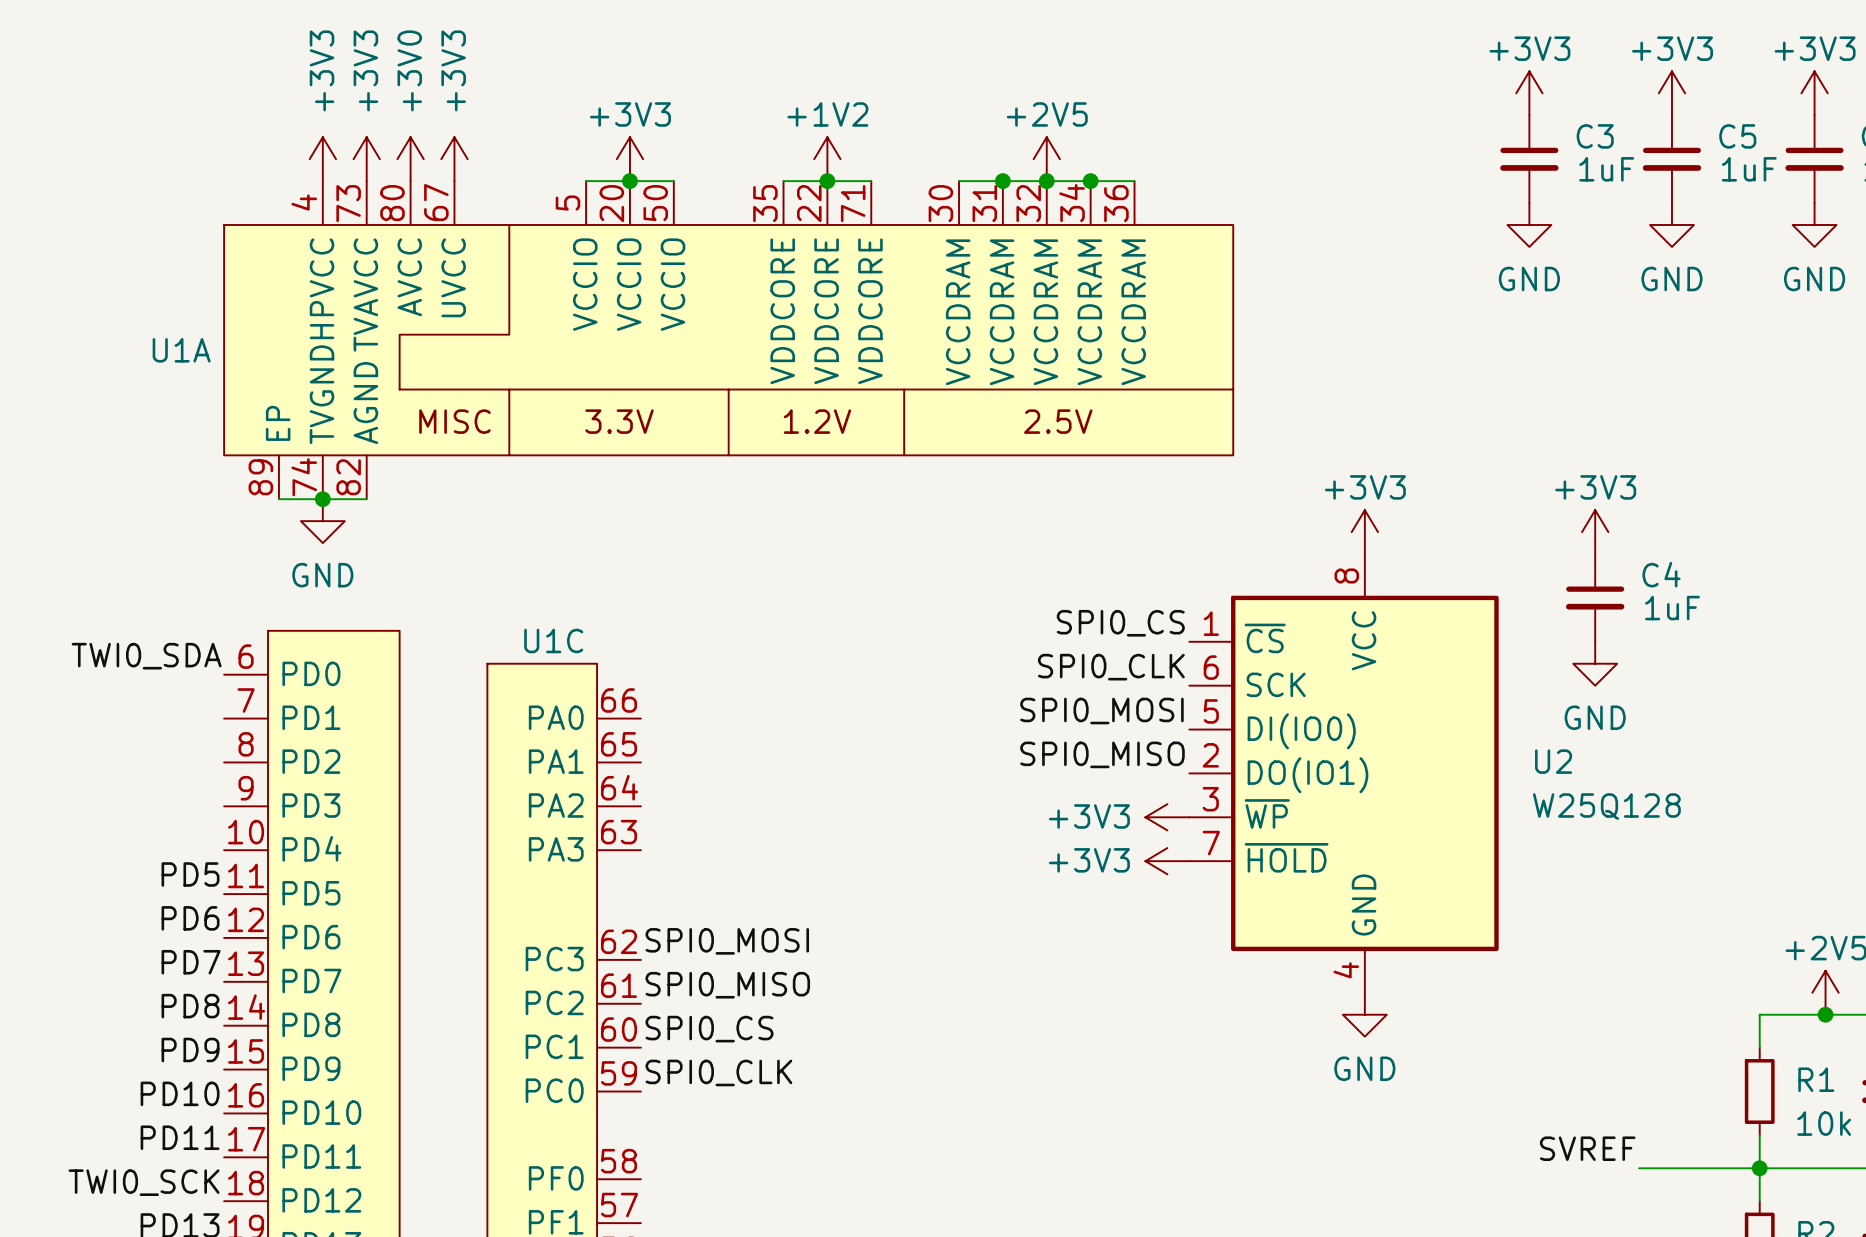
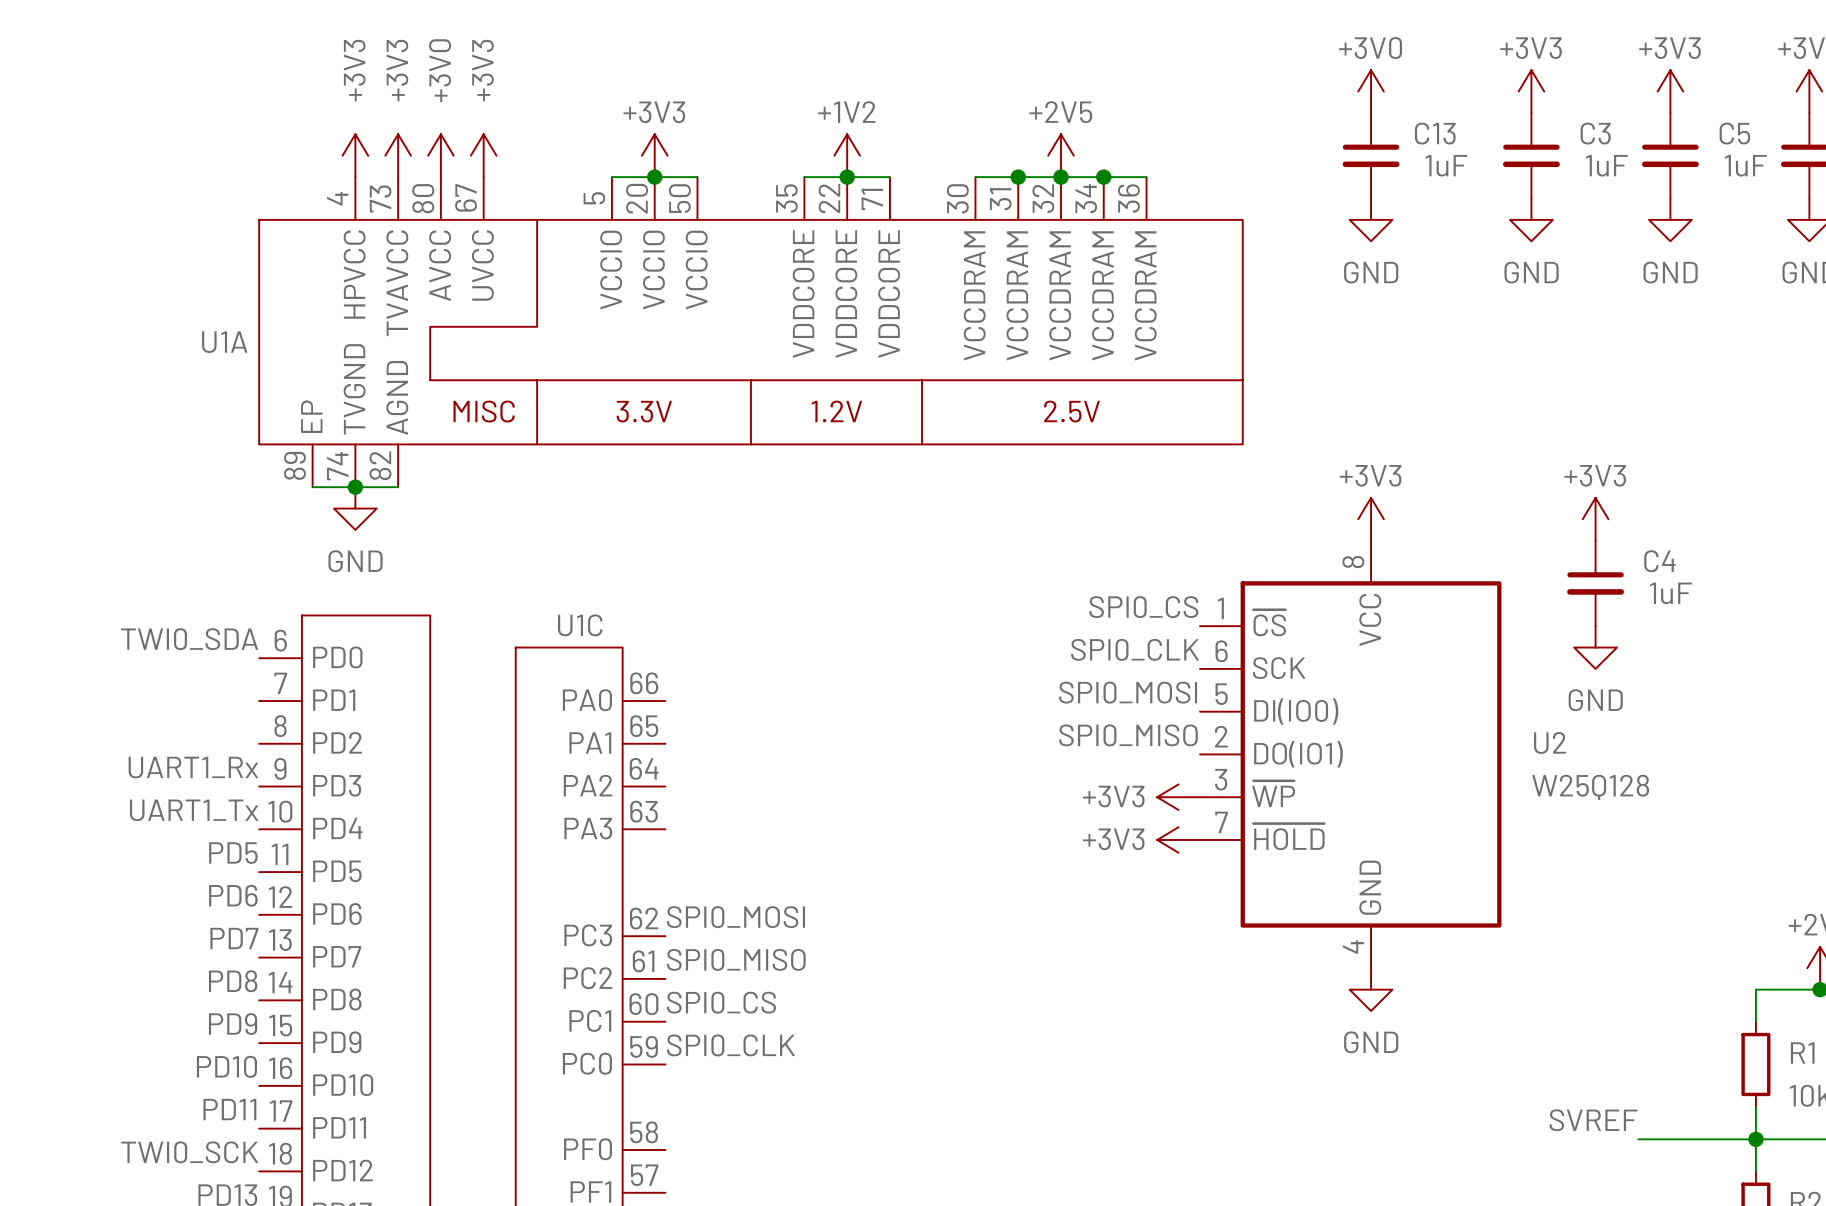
power symbol: none -> +3V0 (1371, 91)
C13: none -> 1uF (1371, 155)
power symbol: none -> GND (1371, 219)
label: none -> UART1_Rx (193, 767)
label: none -> UART1_Tx (194, 810)

